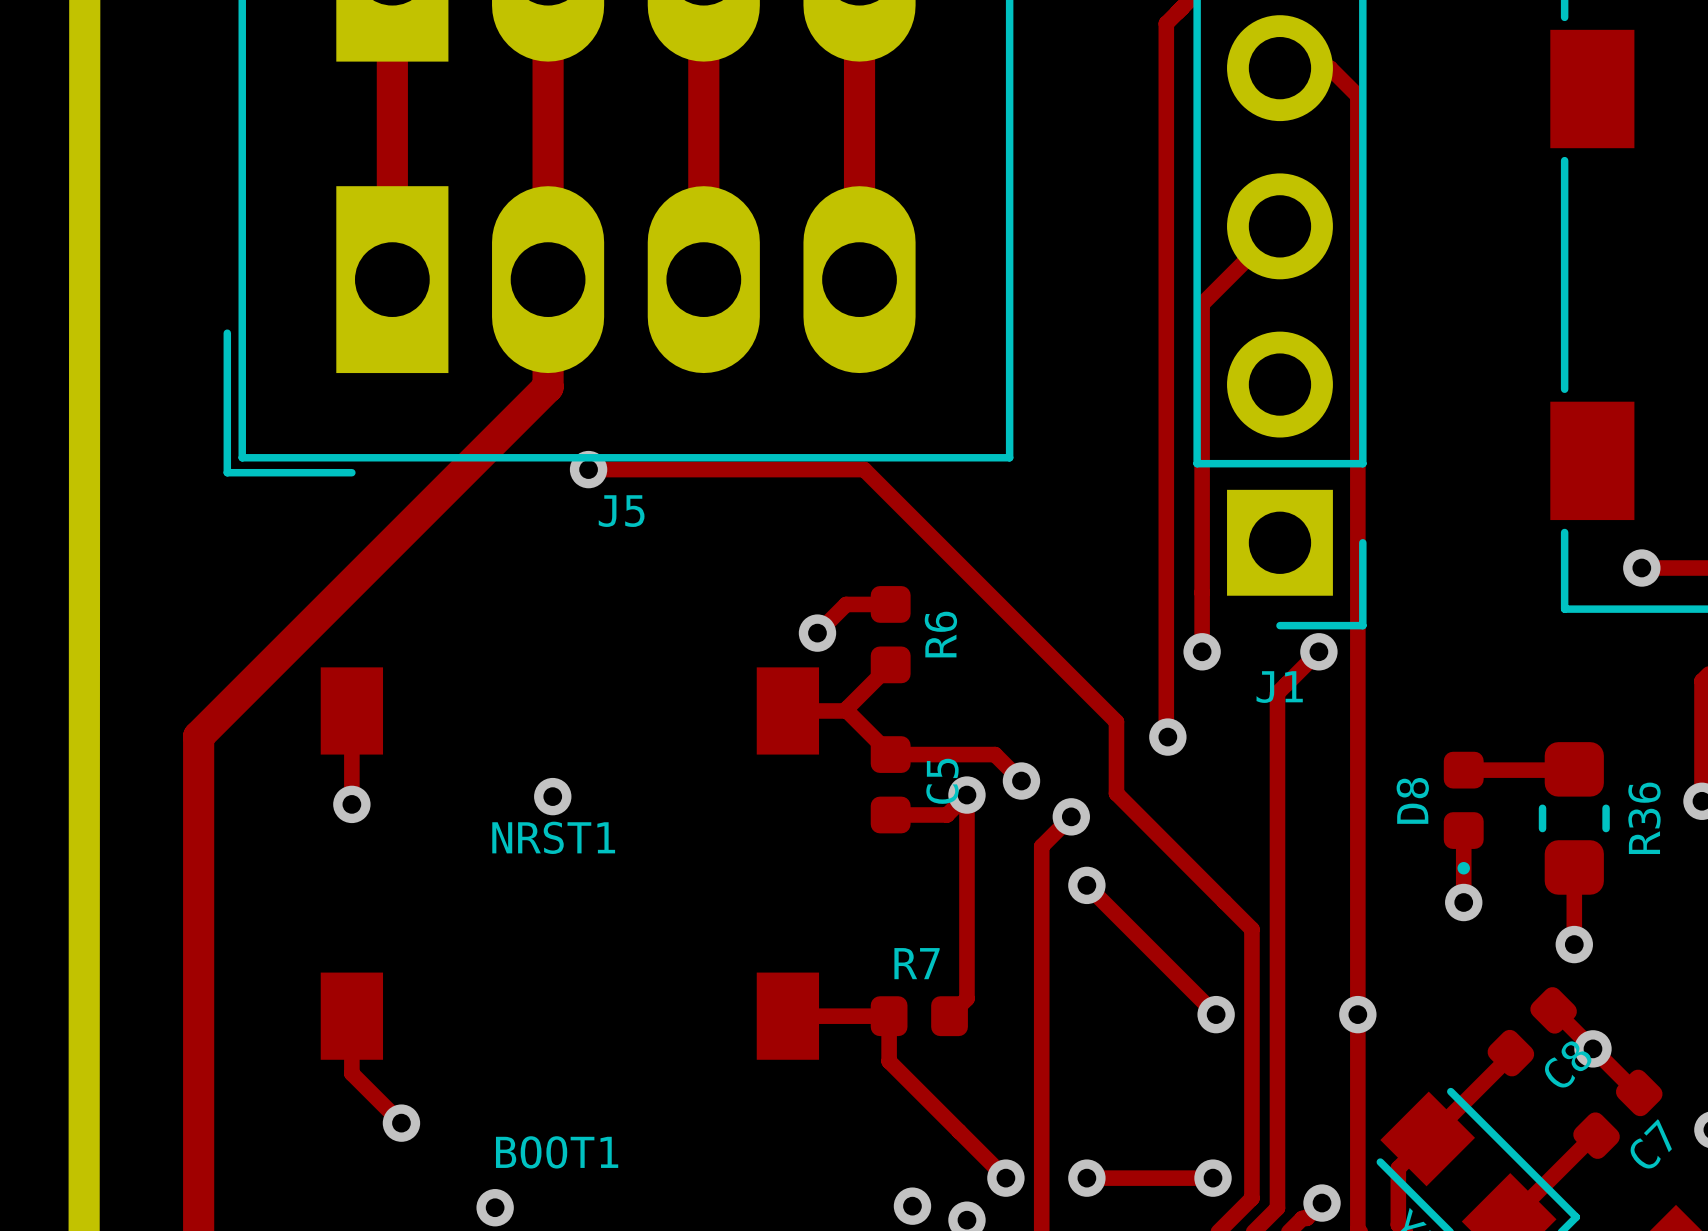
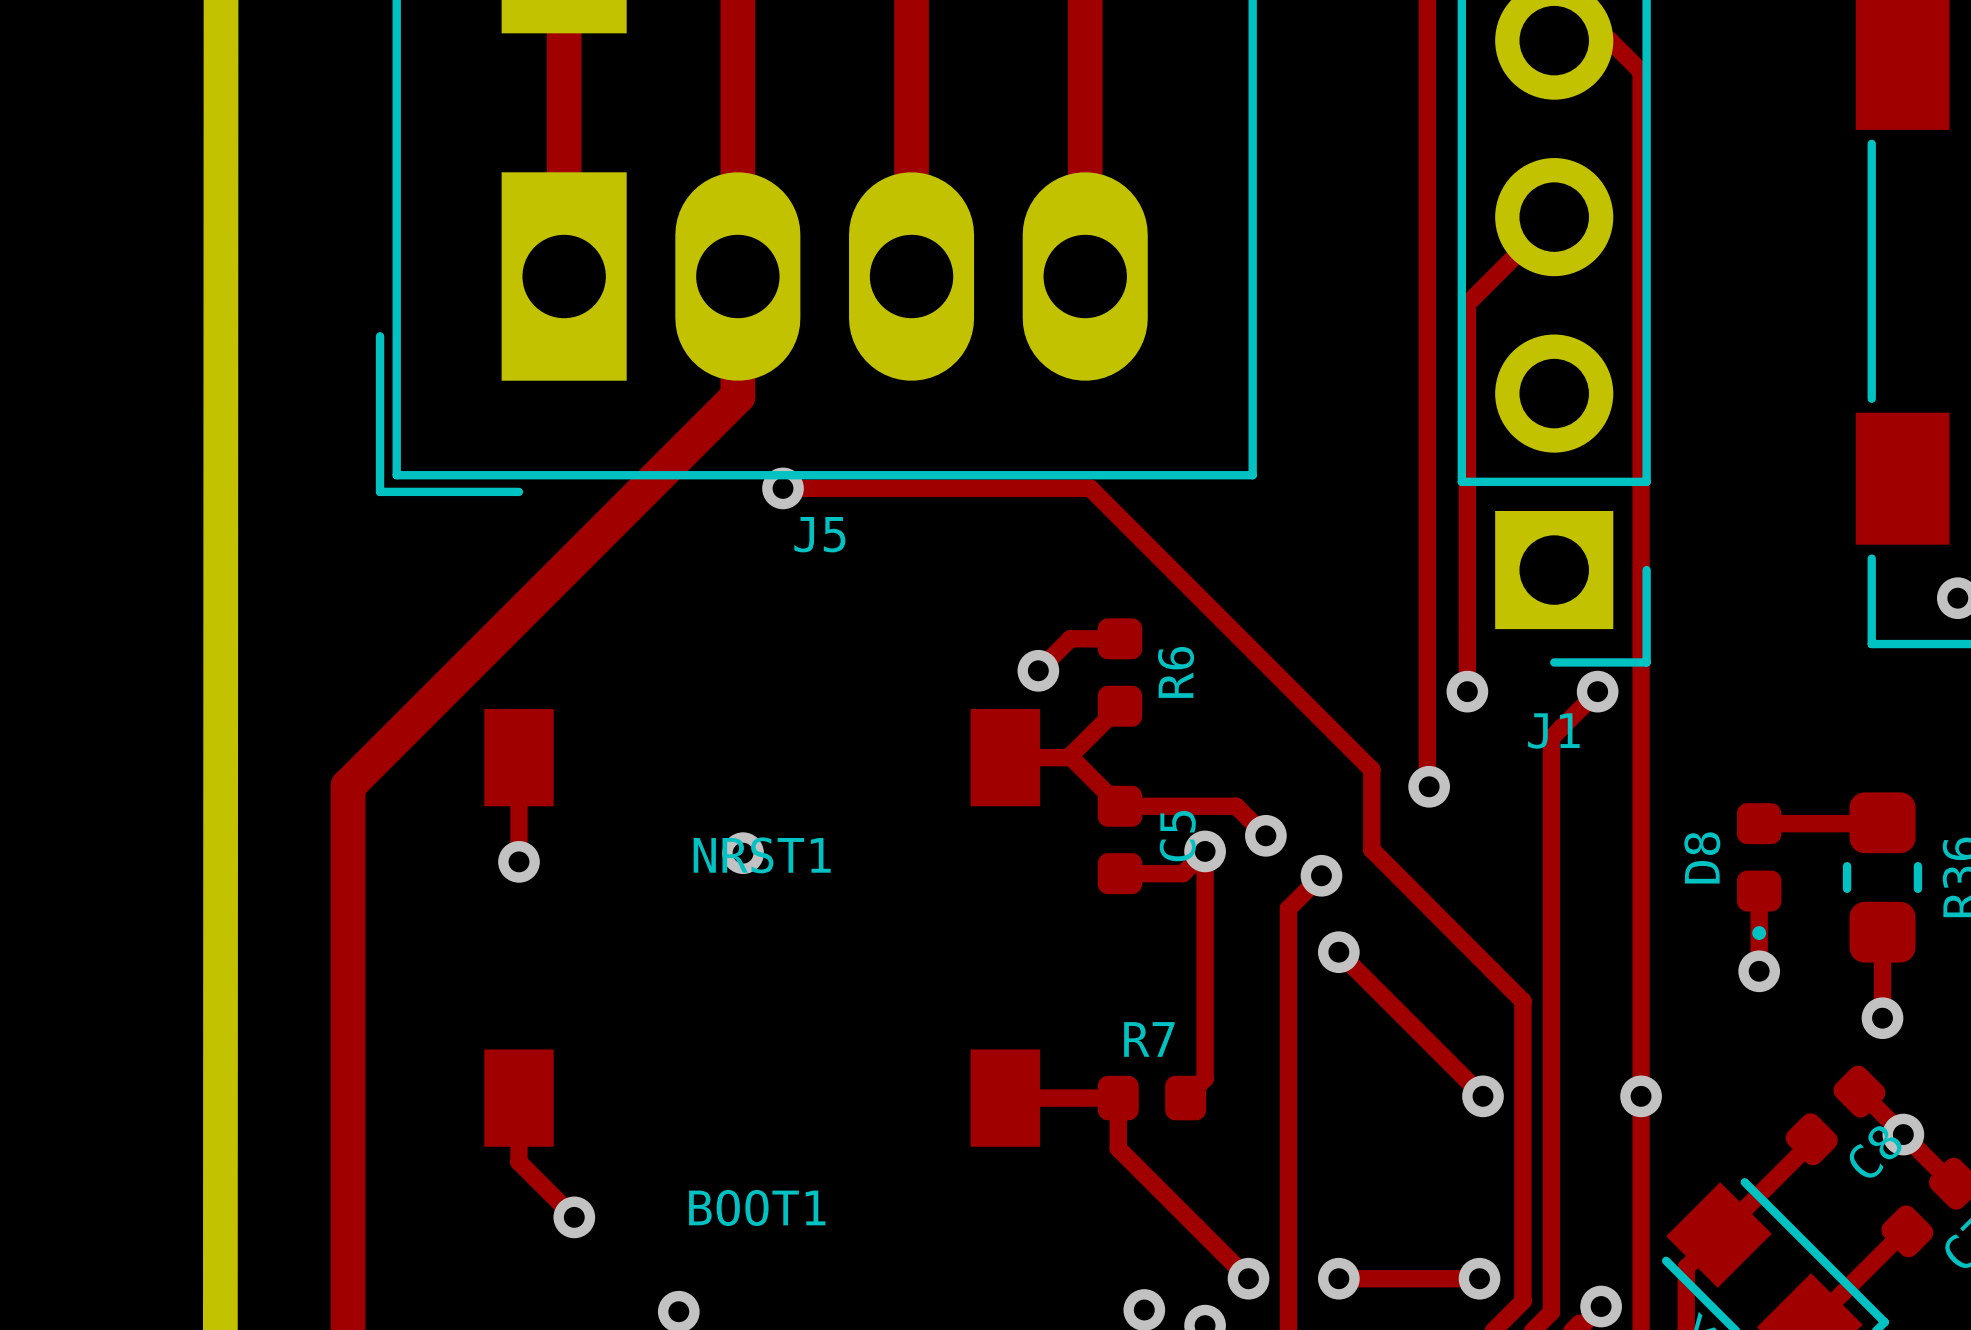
NRST1 name position: NRST1 (553, 837) -> NRST1 (762, 855)
BOOT1 name position: BOOT1 (557, 1152) -> BOOT1 (757, 1207)

